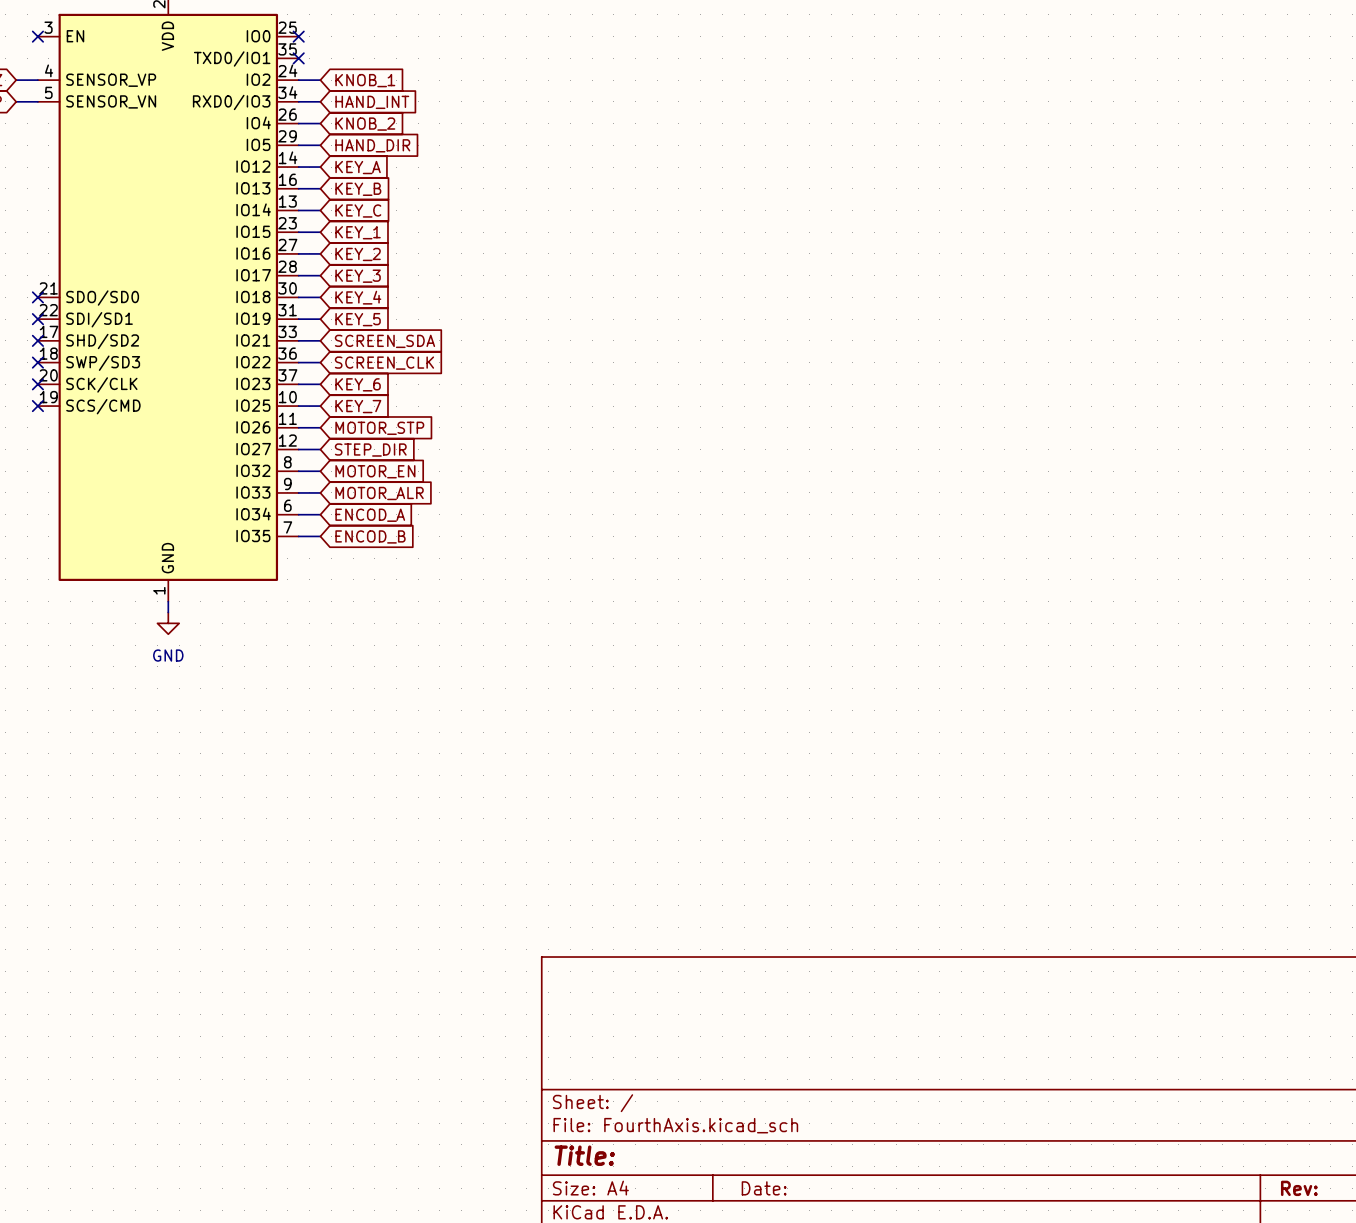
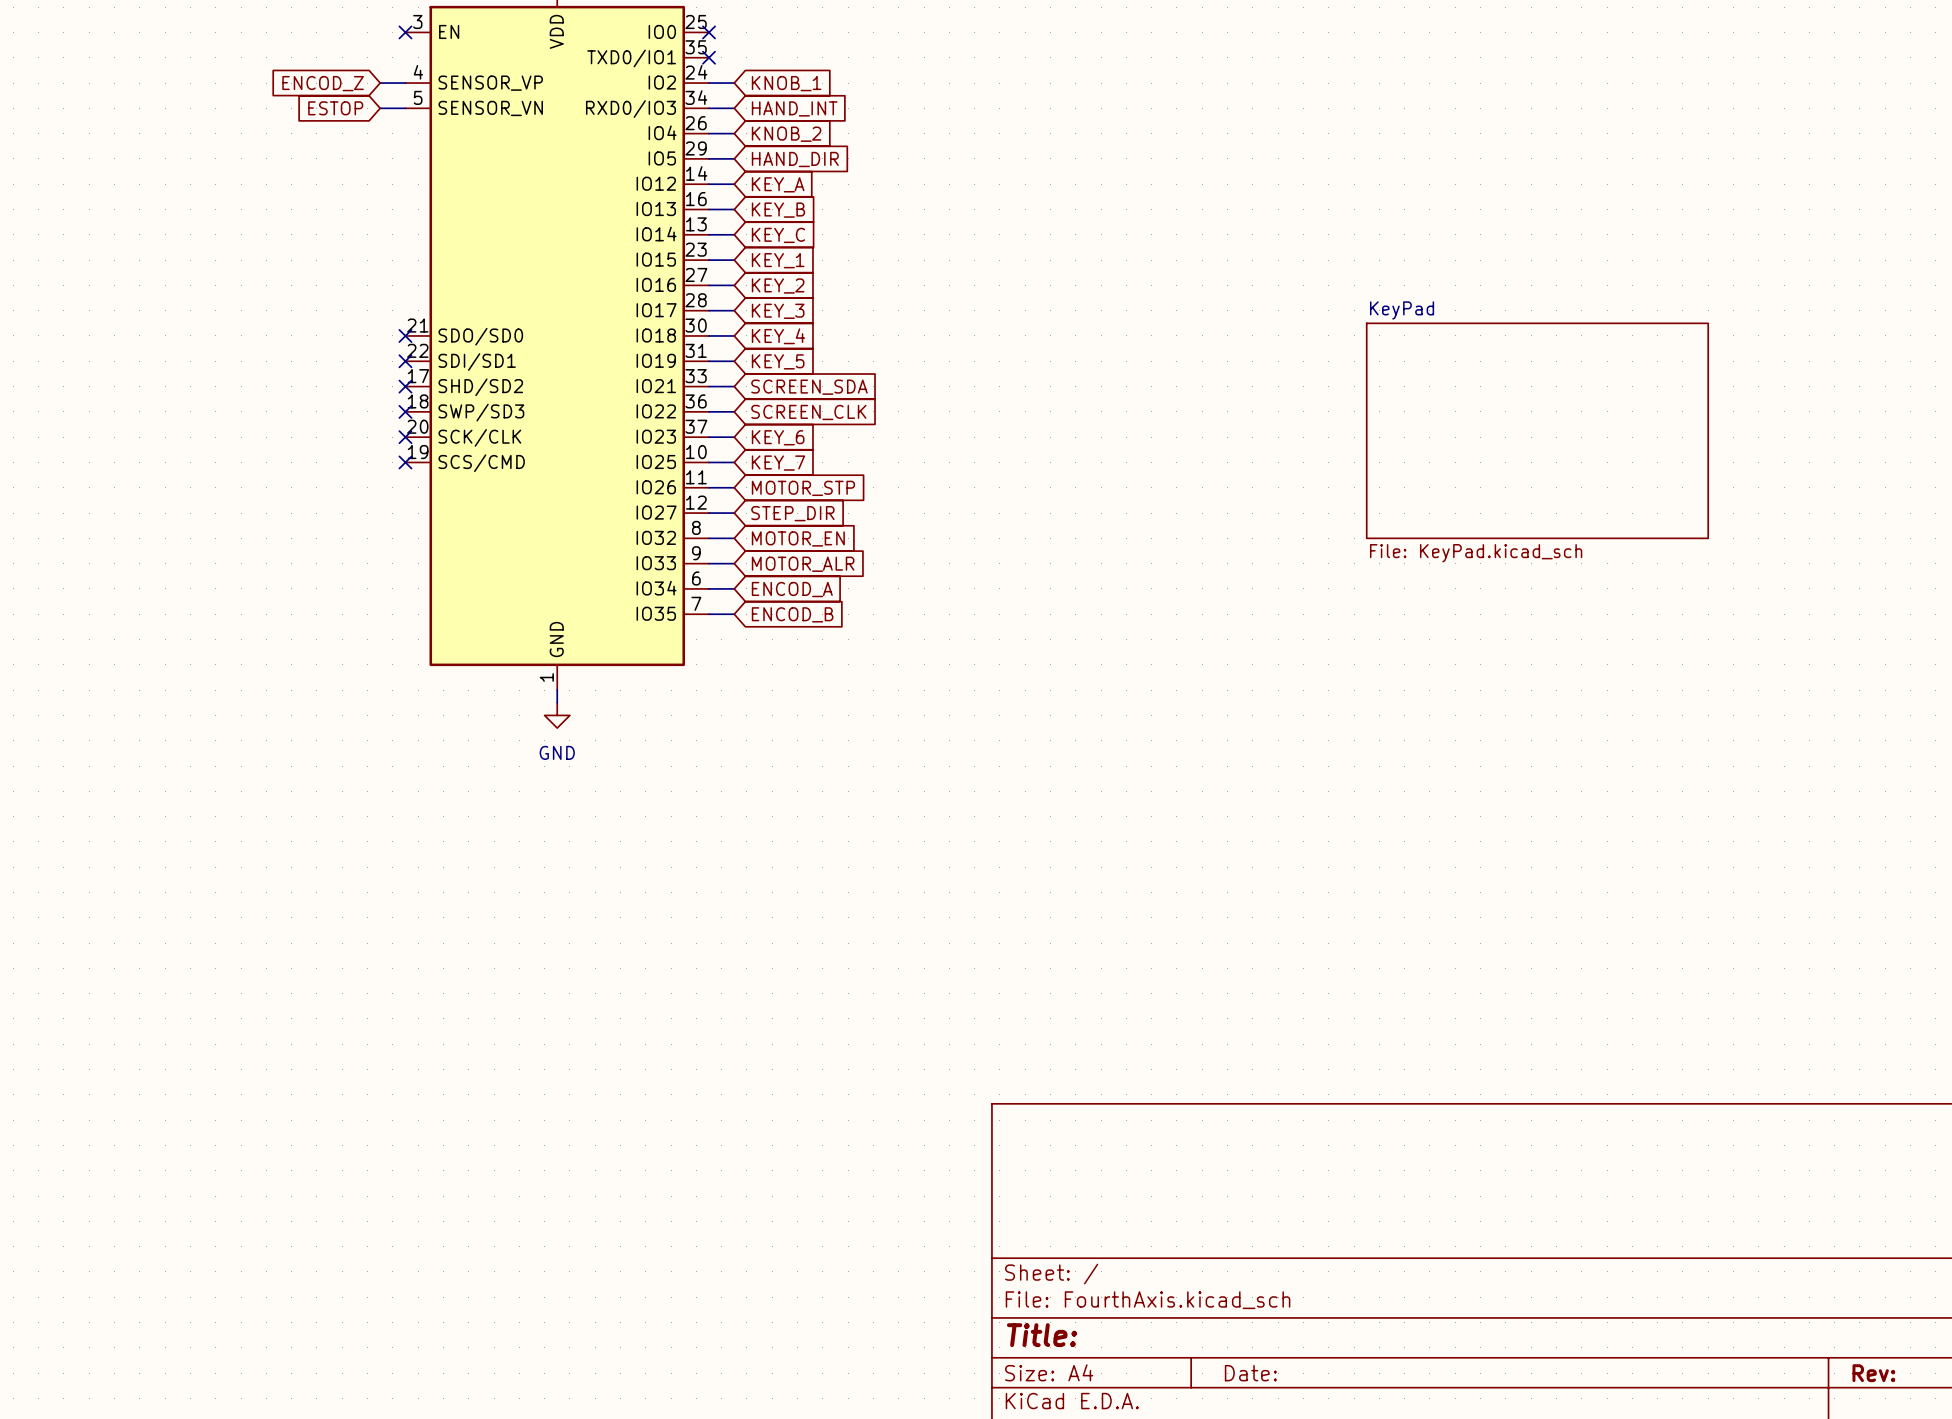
sheet KeyPad: none -> File: KeyPad.kicad_sch (1537, 430)

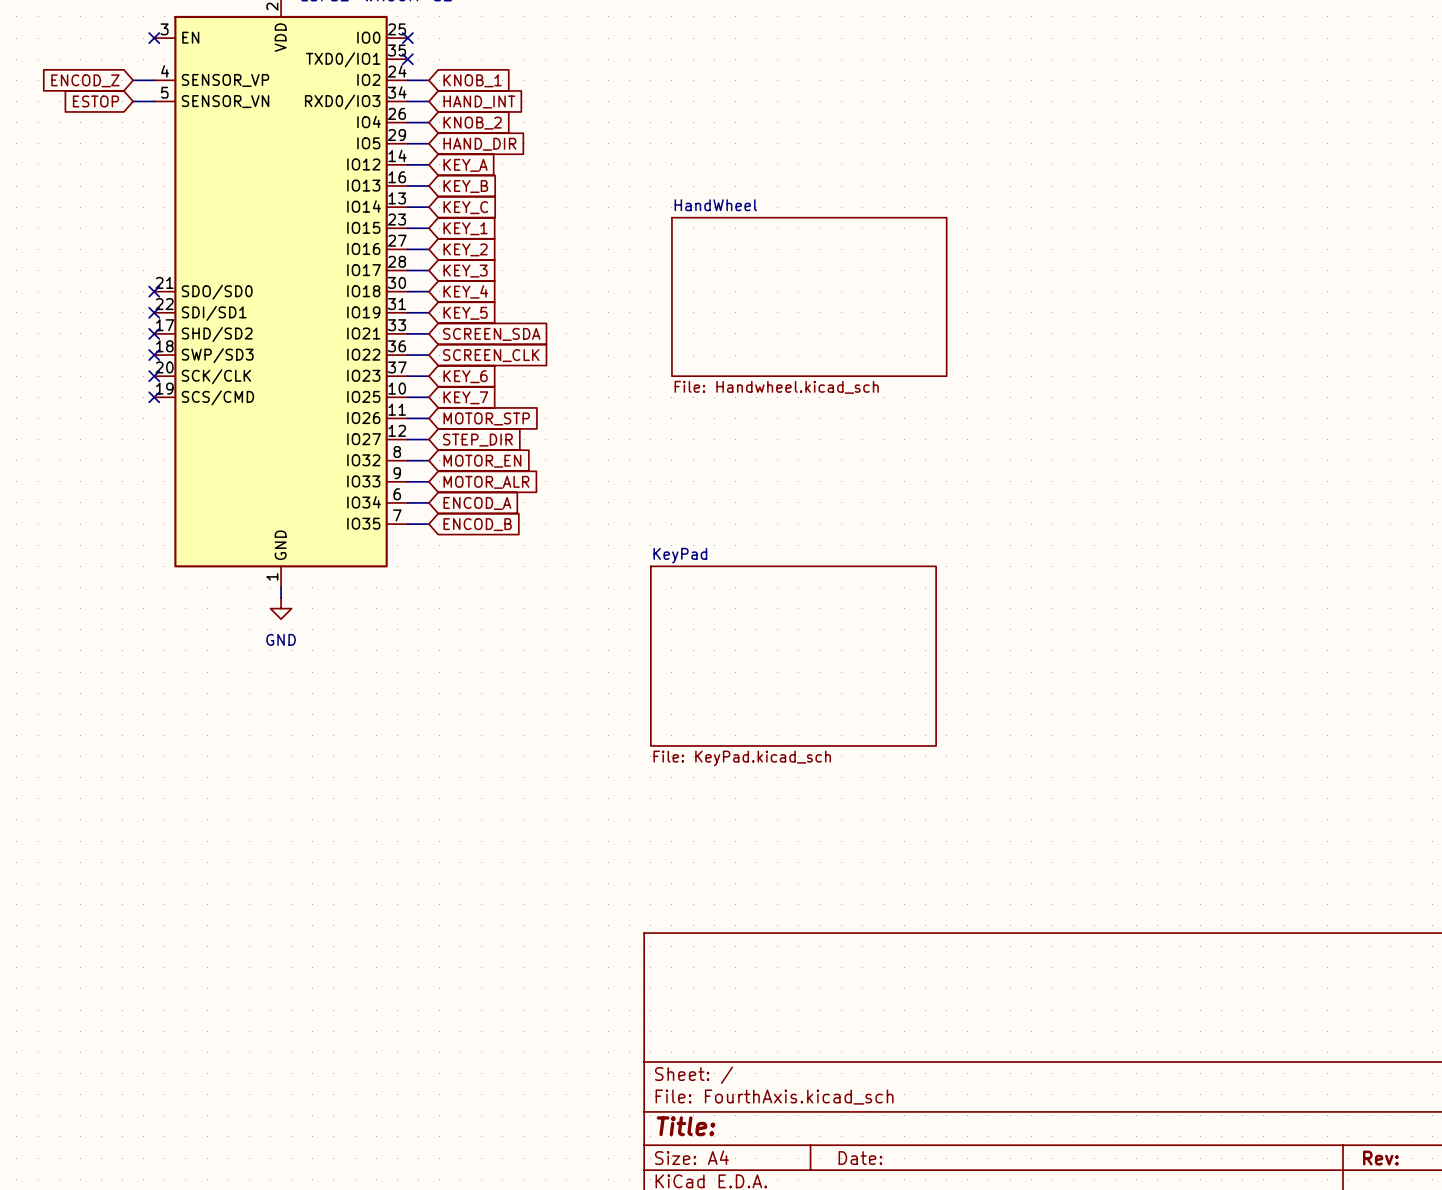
sheet HandWheel: none -> File: Handwheel.kicad_sch (809, 296)
sheet KeyPad: File: KeyPad.kicad_sch (1537, 430) -> none
sheet KeyPad: none -> File: KeyPad.kicad_sch (793, 656)

